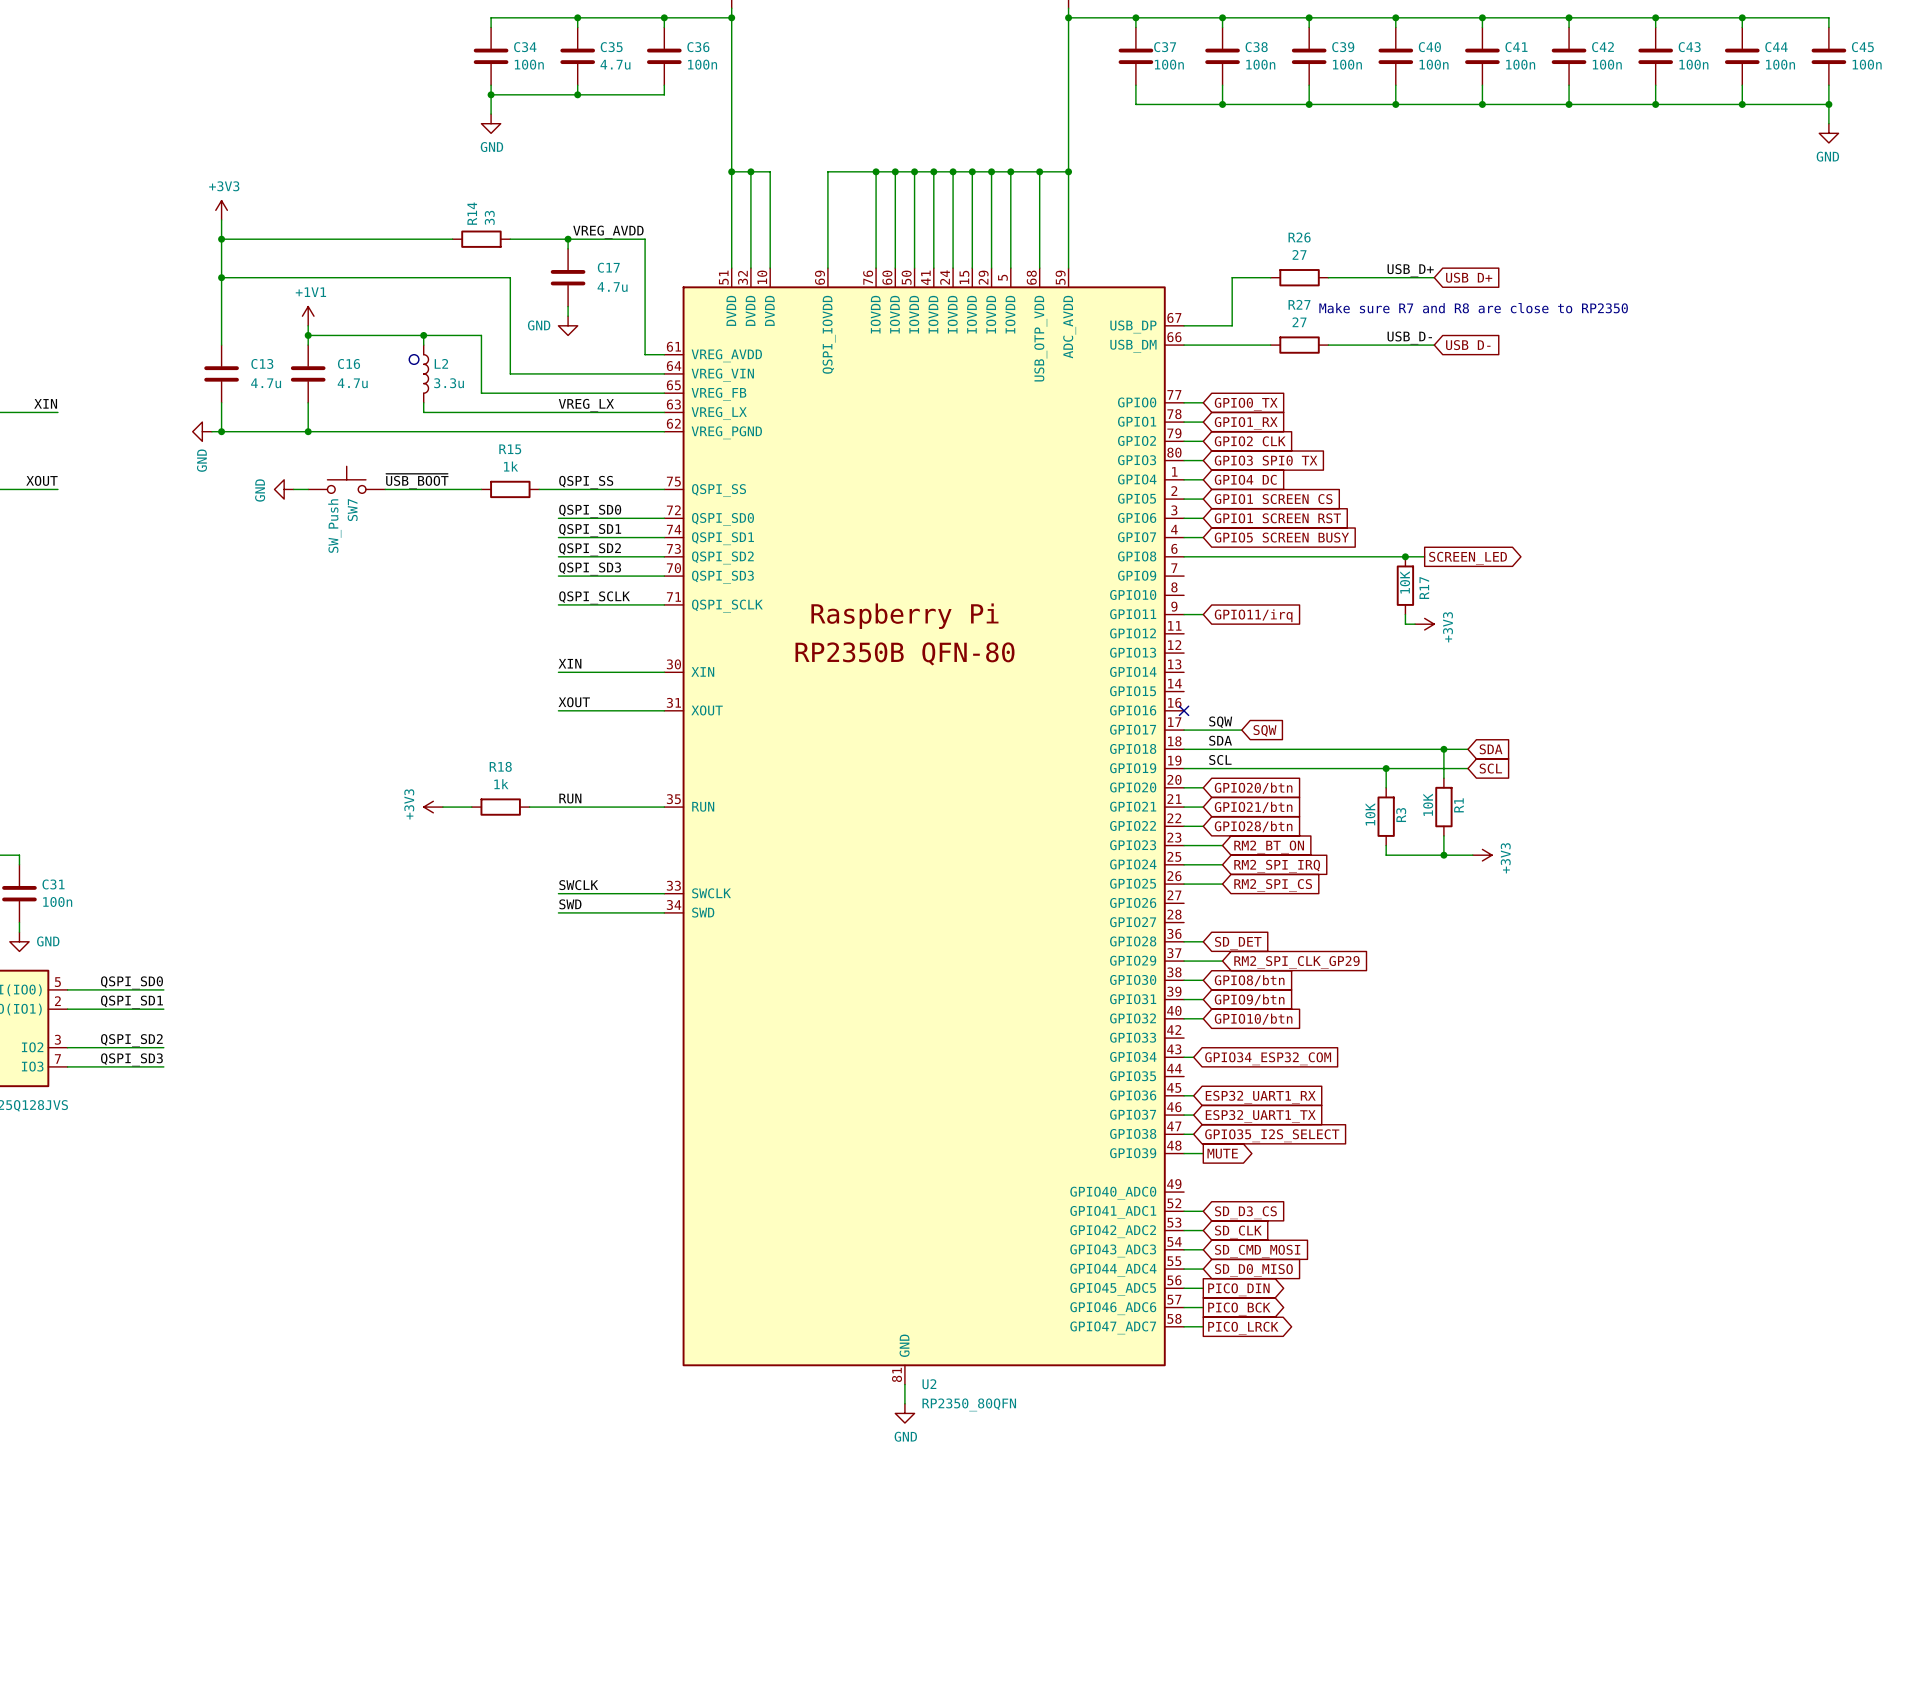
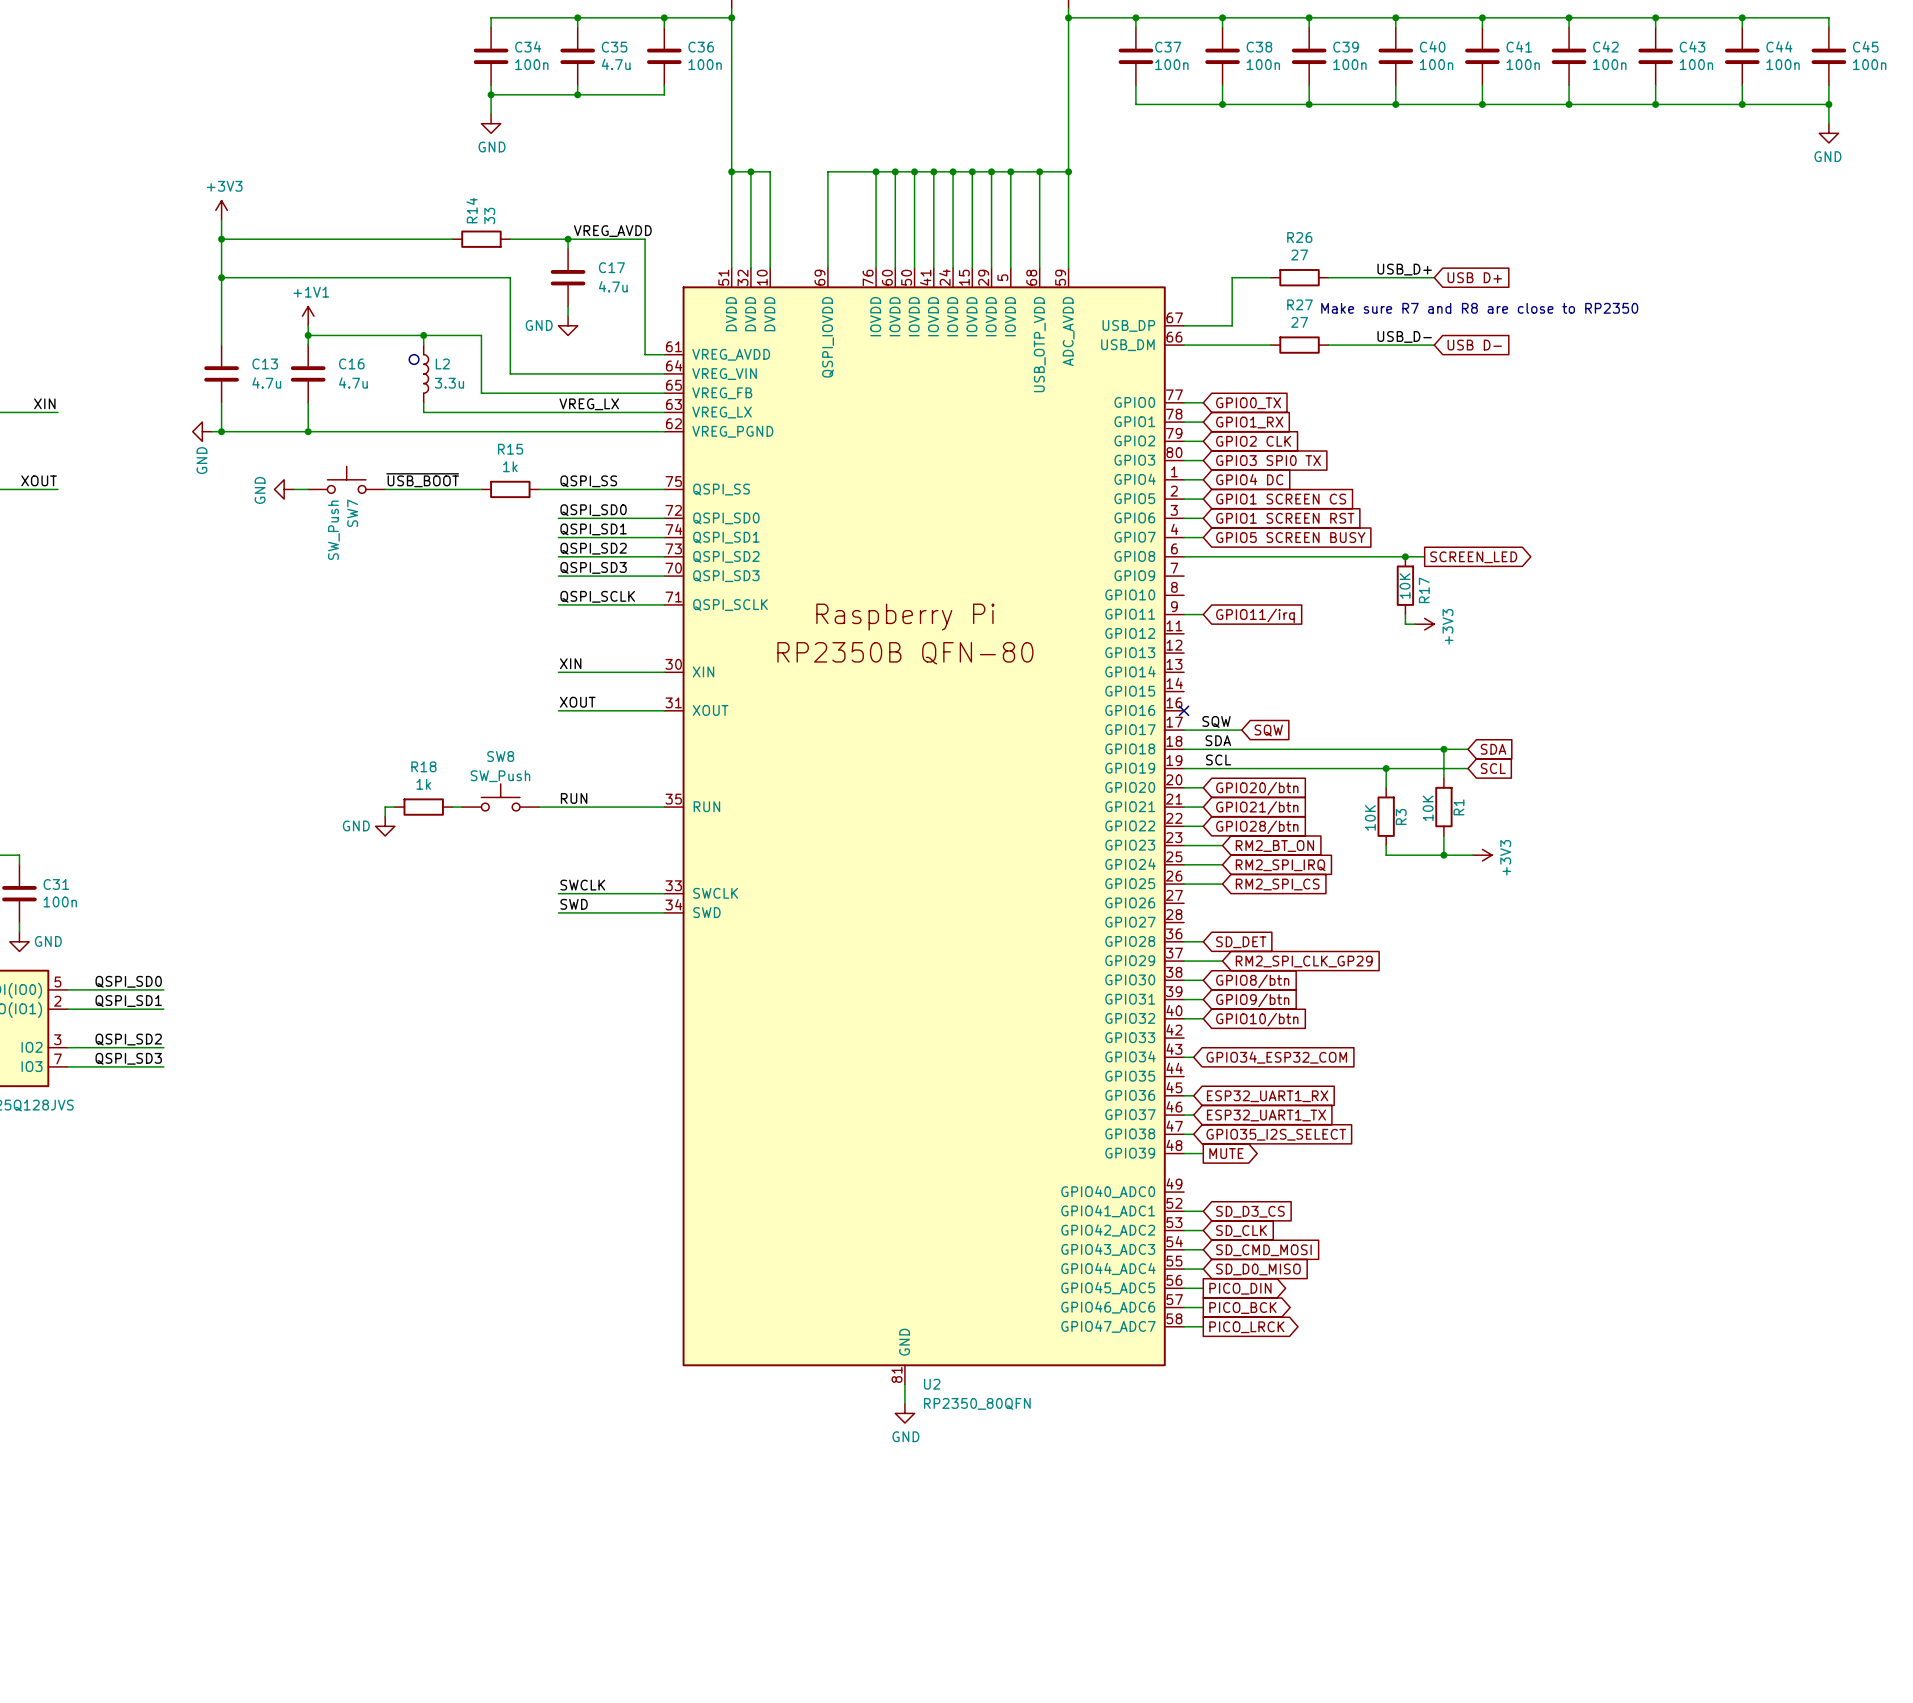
SW8: none -> SW_Push (500, 797)
wire: none -> (394, 807) (385, 807) (385, 816)
power symbol: +3V3 (433, 807) -> none
R18 position: (500, 807) -> (423, 807)
power symbol: none -> GND (385, 826)

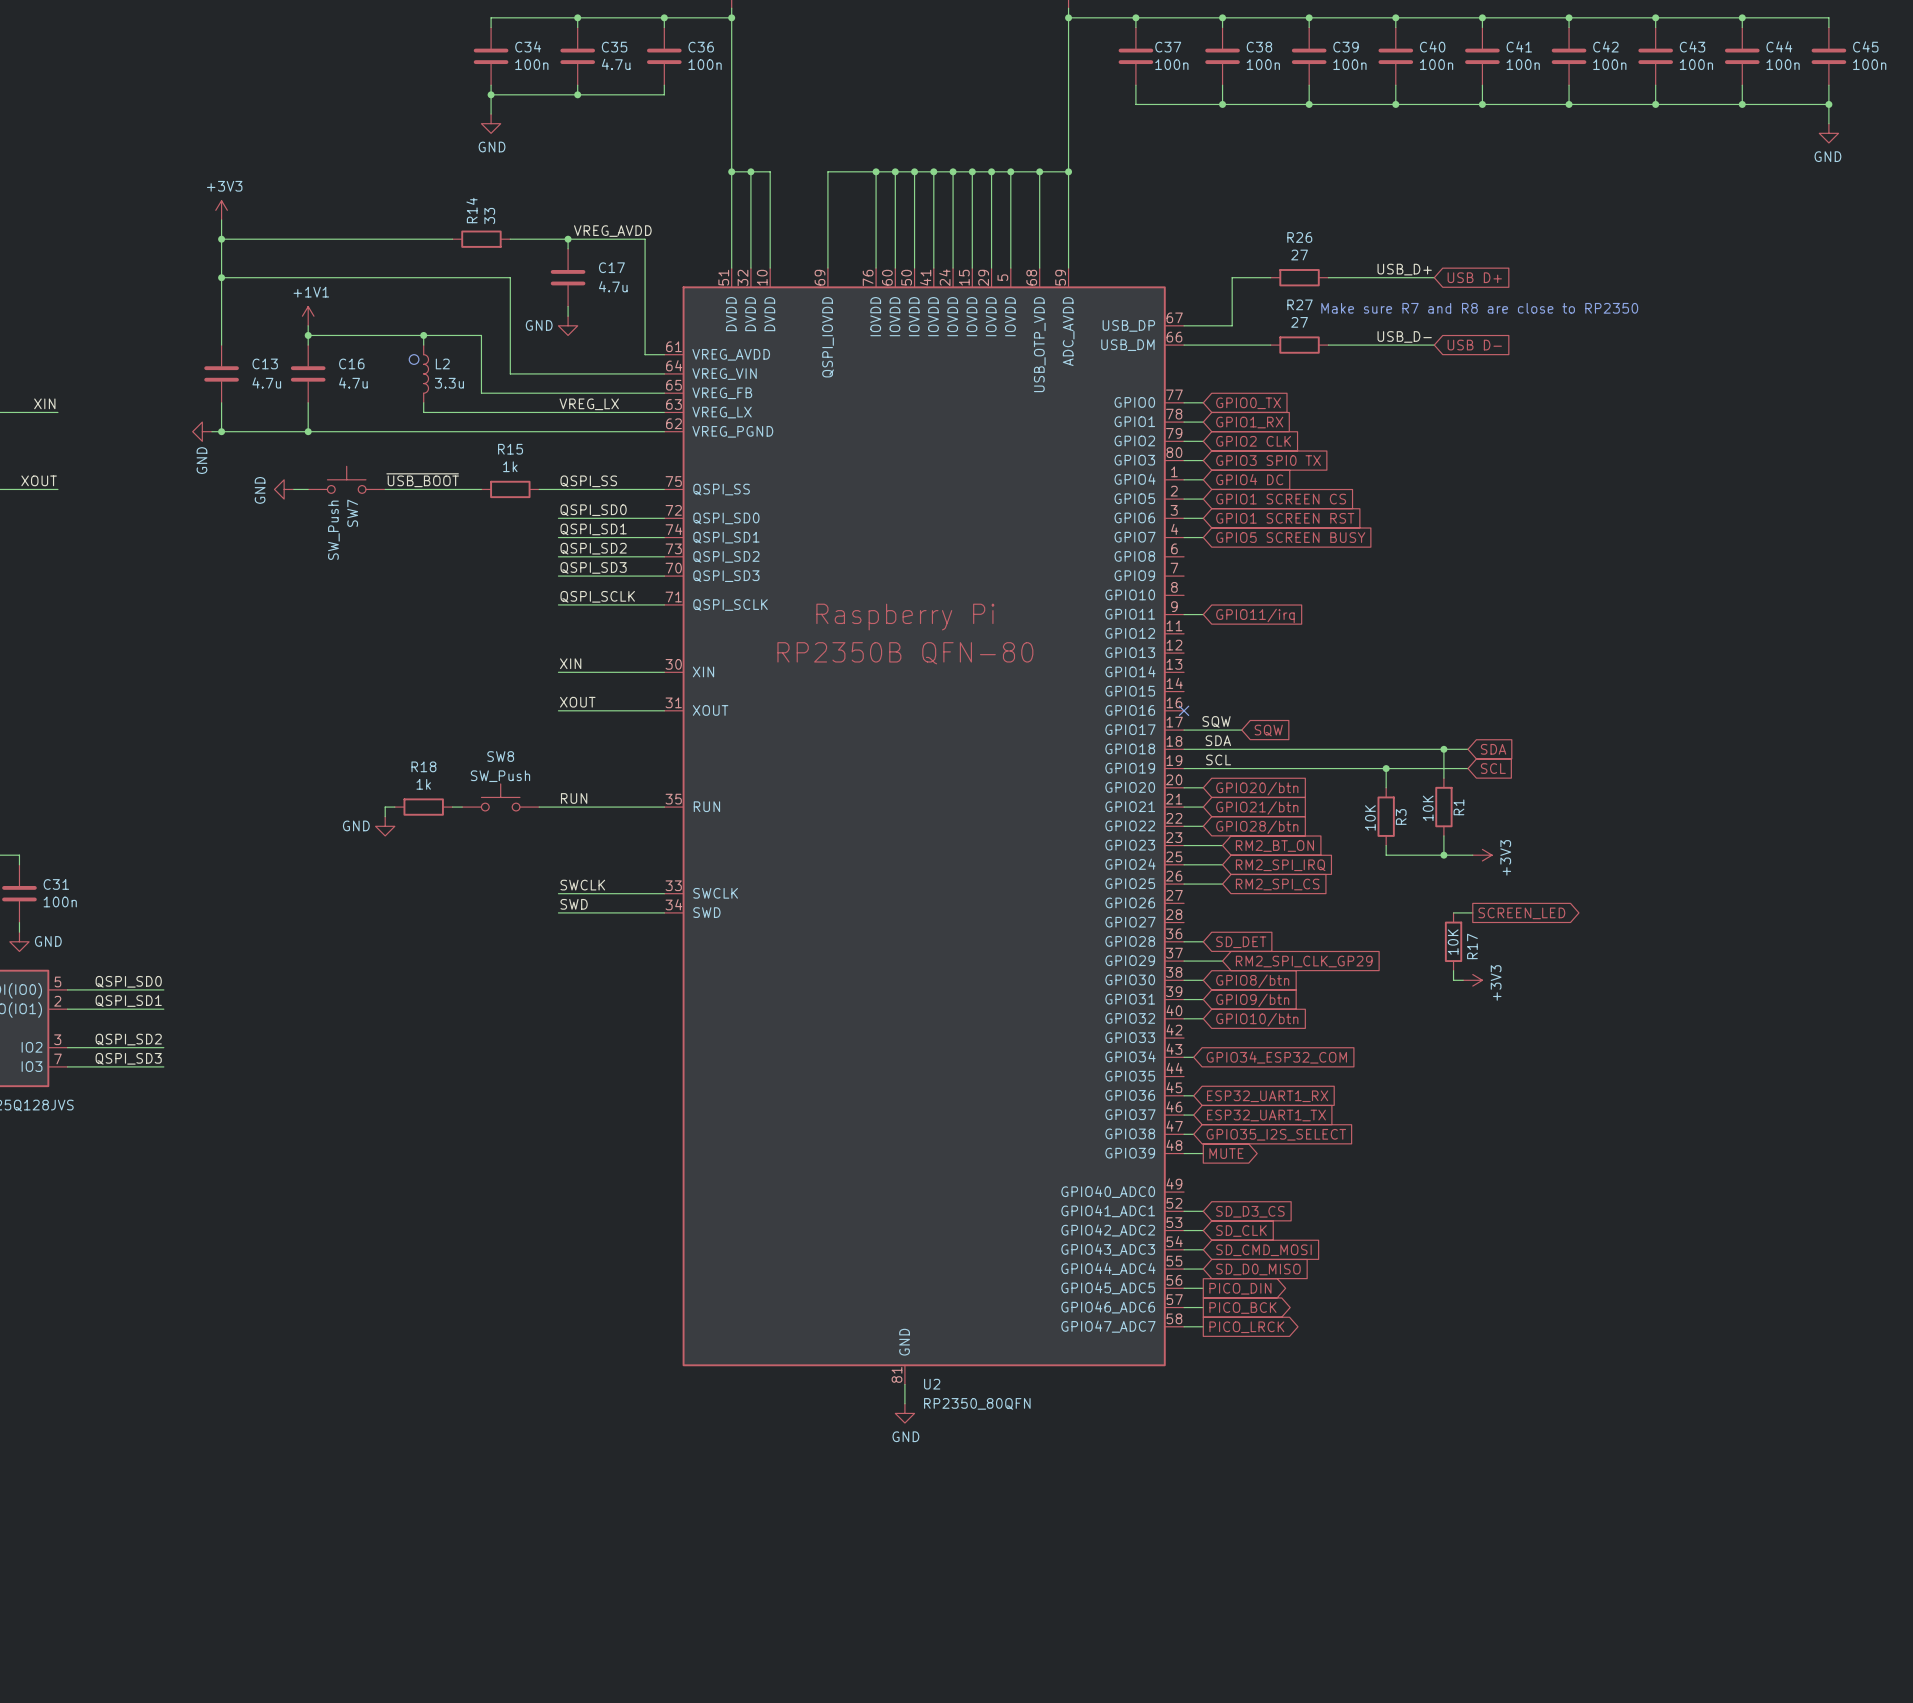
wire: (1184, 556) (1424, 556) -> none
junction: (1405, 556) -> none
global label: SCREEN_LED (1473, 557) -> none
R17 position: (1405, 585) -> (1453, 941)
wire: (1405, 614) (1405, 624) (1415, 624) -> none
power symbol: +3V3 (1424, 624) -> none
wire: none -> (1453, 912) (1472, 912)
global label: none -> SCREEN_LED (1521, 913)
wire: none -> (1453, 970) (1453, 980) (1463, 980)
power symbol: none -> +3V3 (1472, 980)

